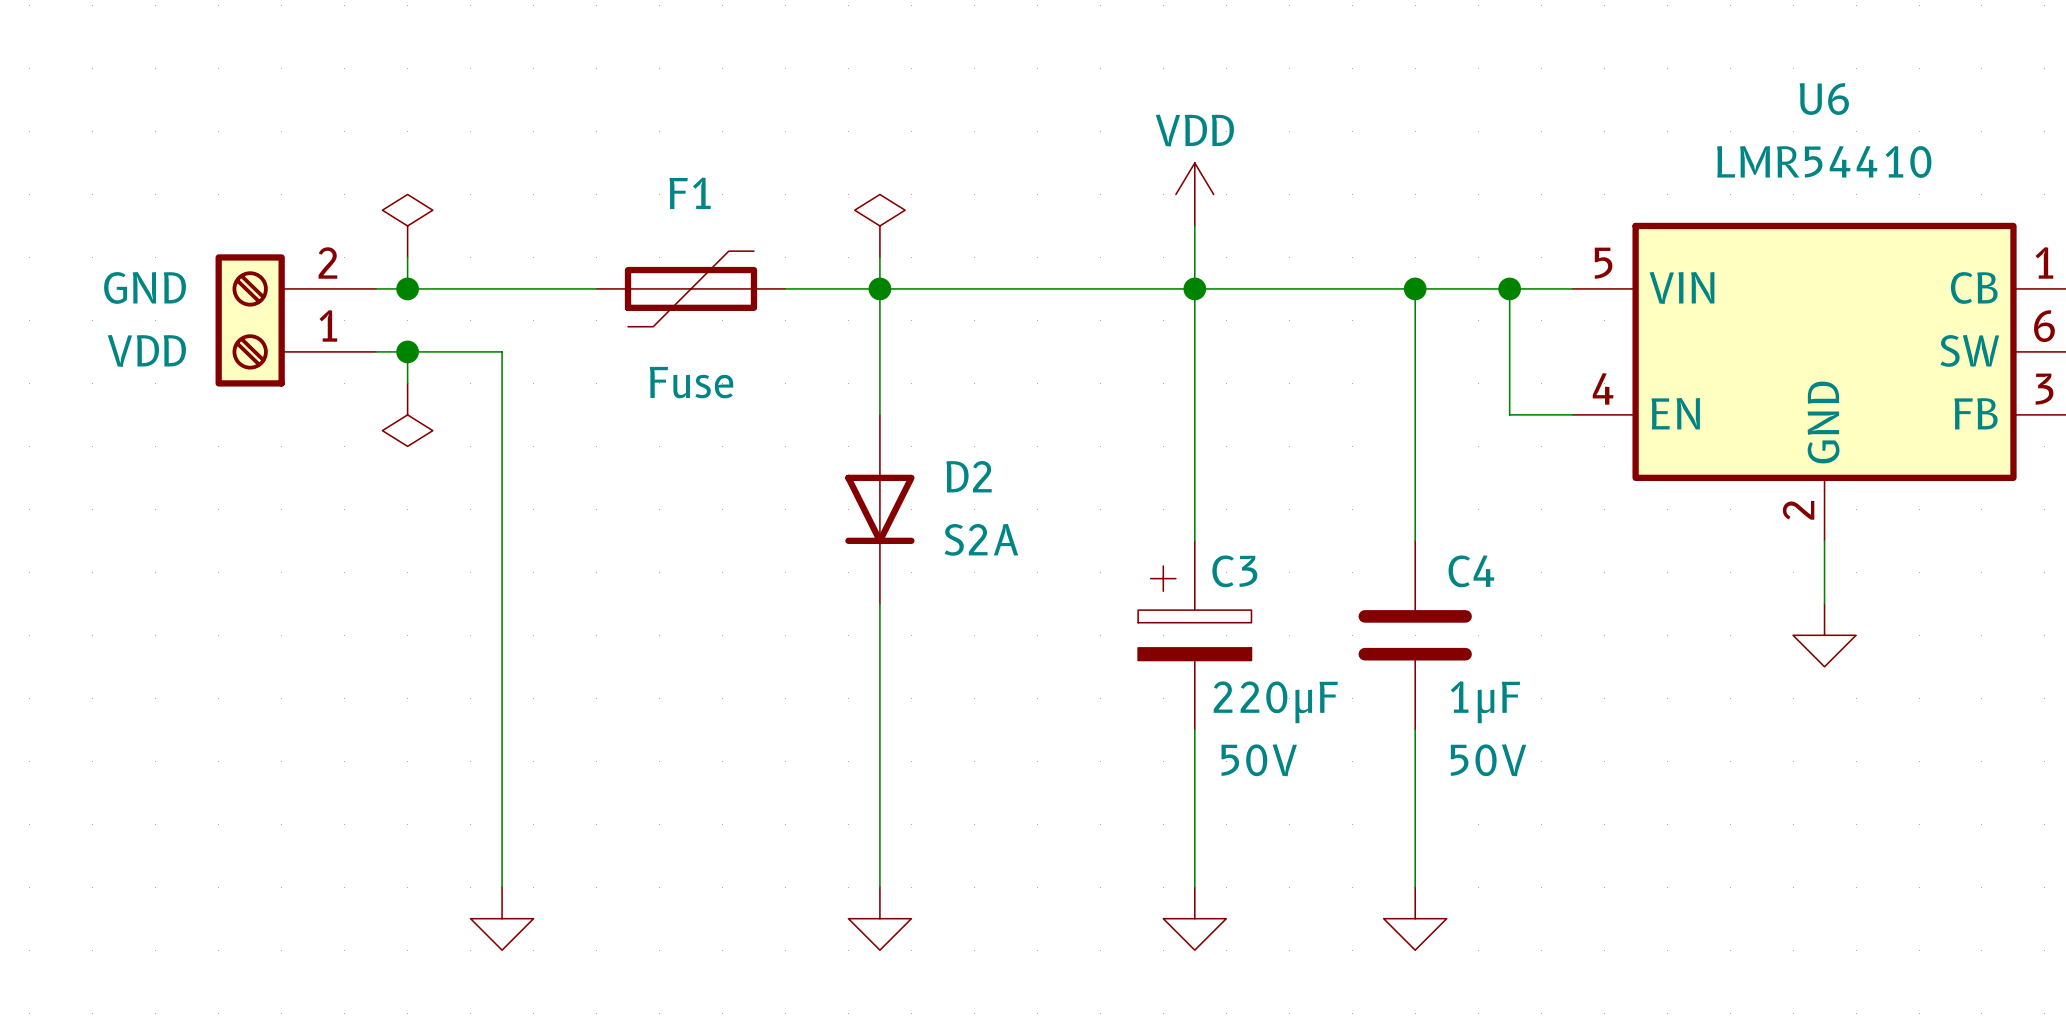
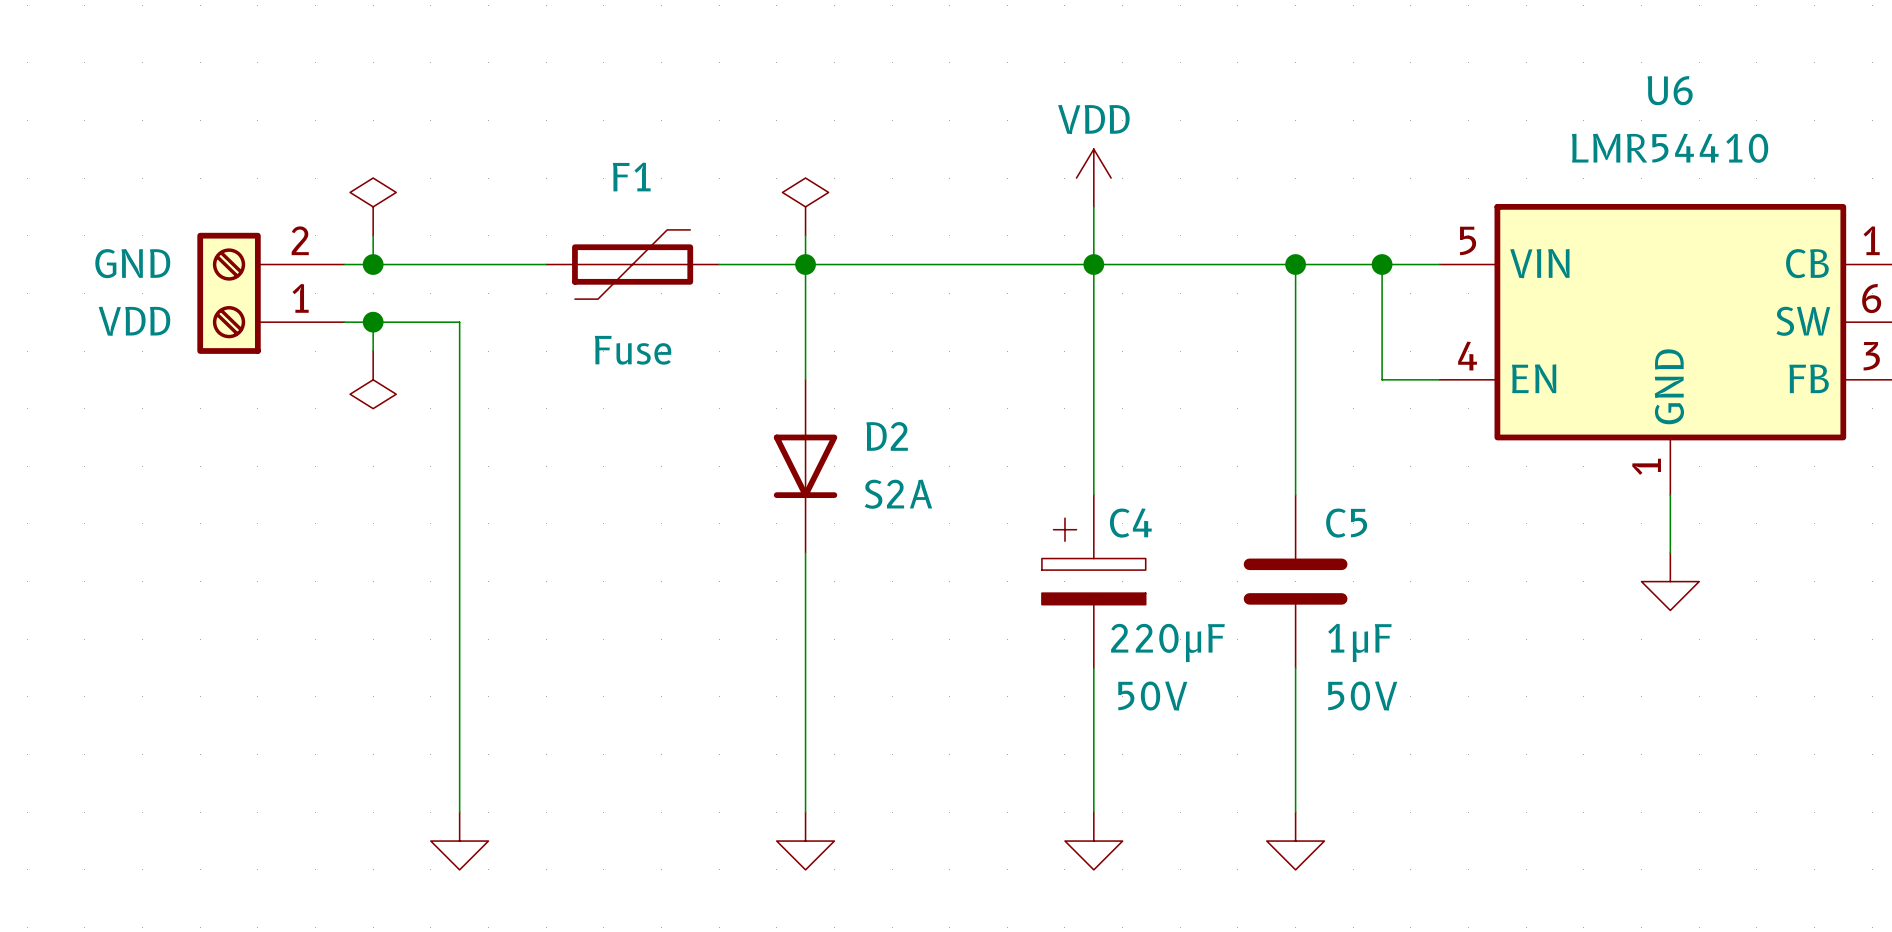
U6 pin number: 2 (1798, 510) -> 1 (1646, 466)
C3 name: C3 (1234, 571) -> C4 (1130, 523)
C4 name: C4 (1471, 571) -> C5 (1346, 523)

